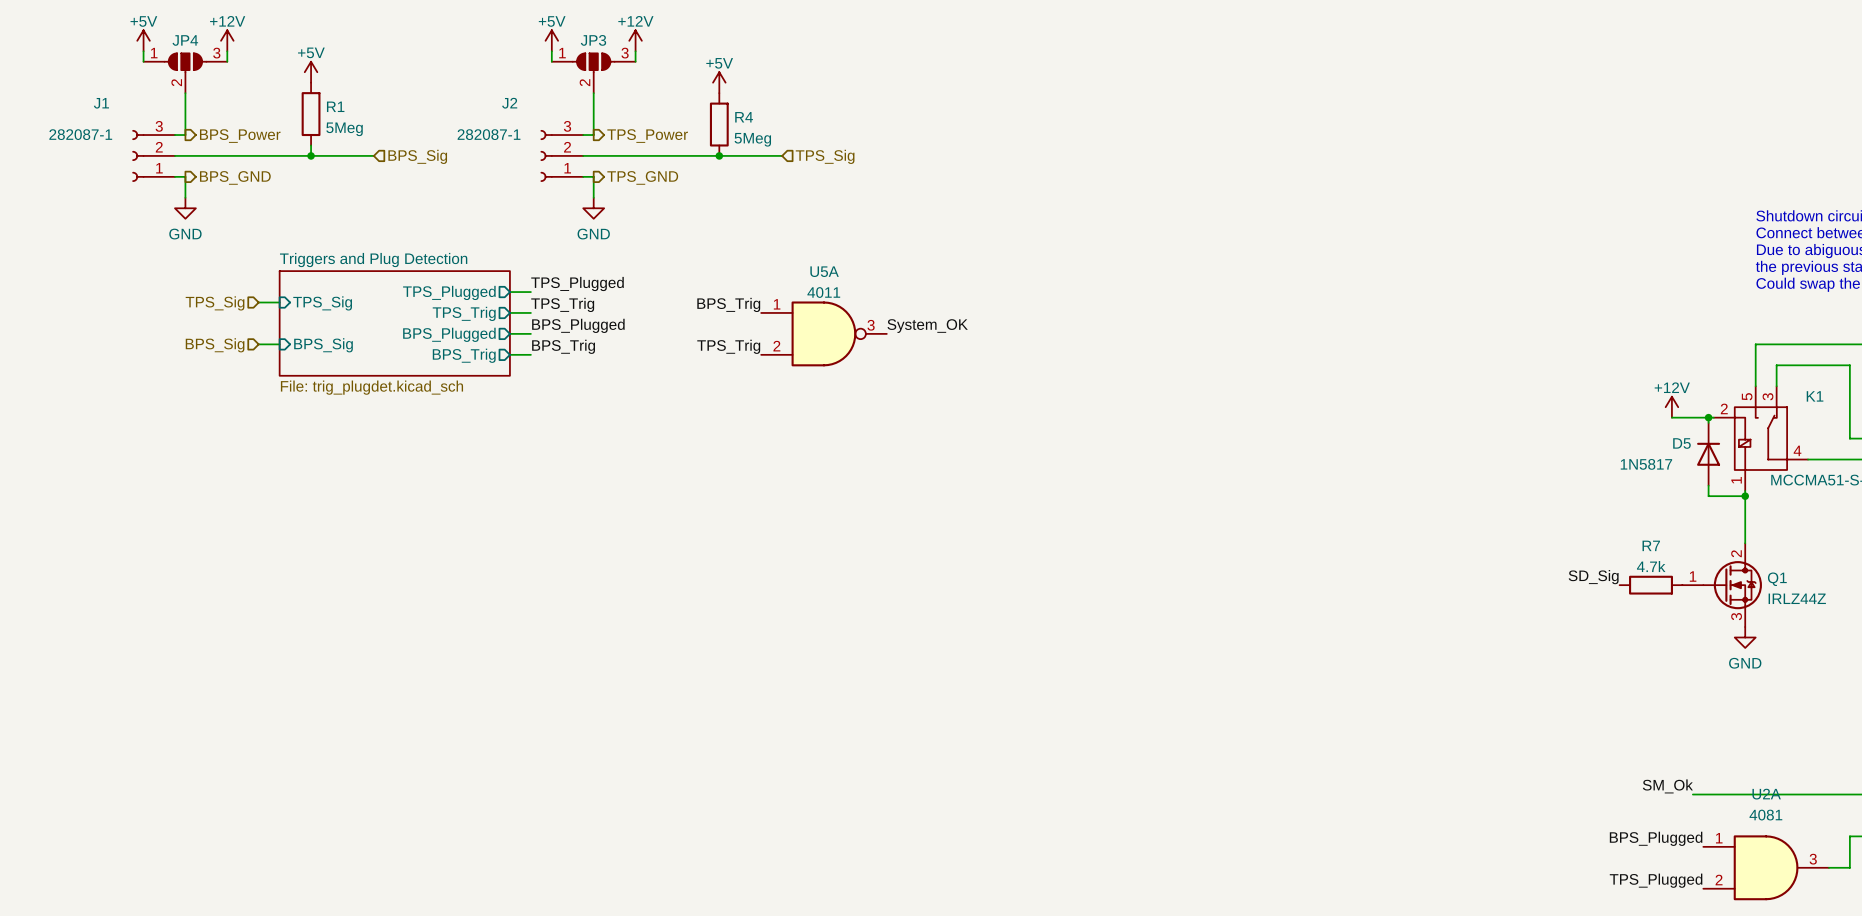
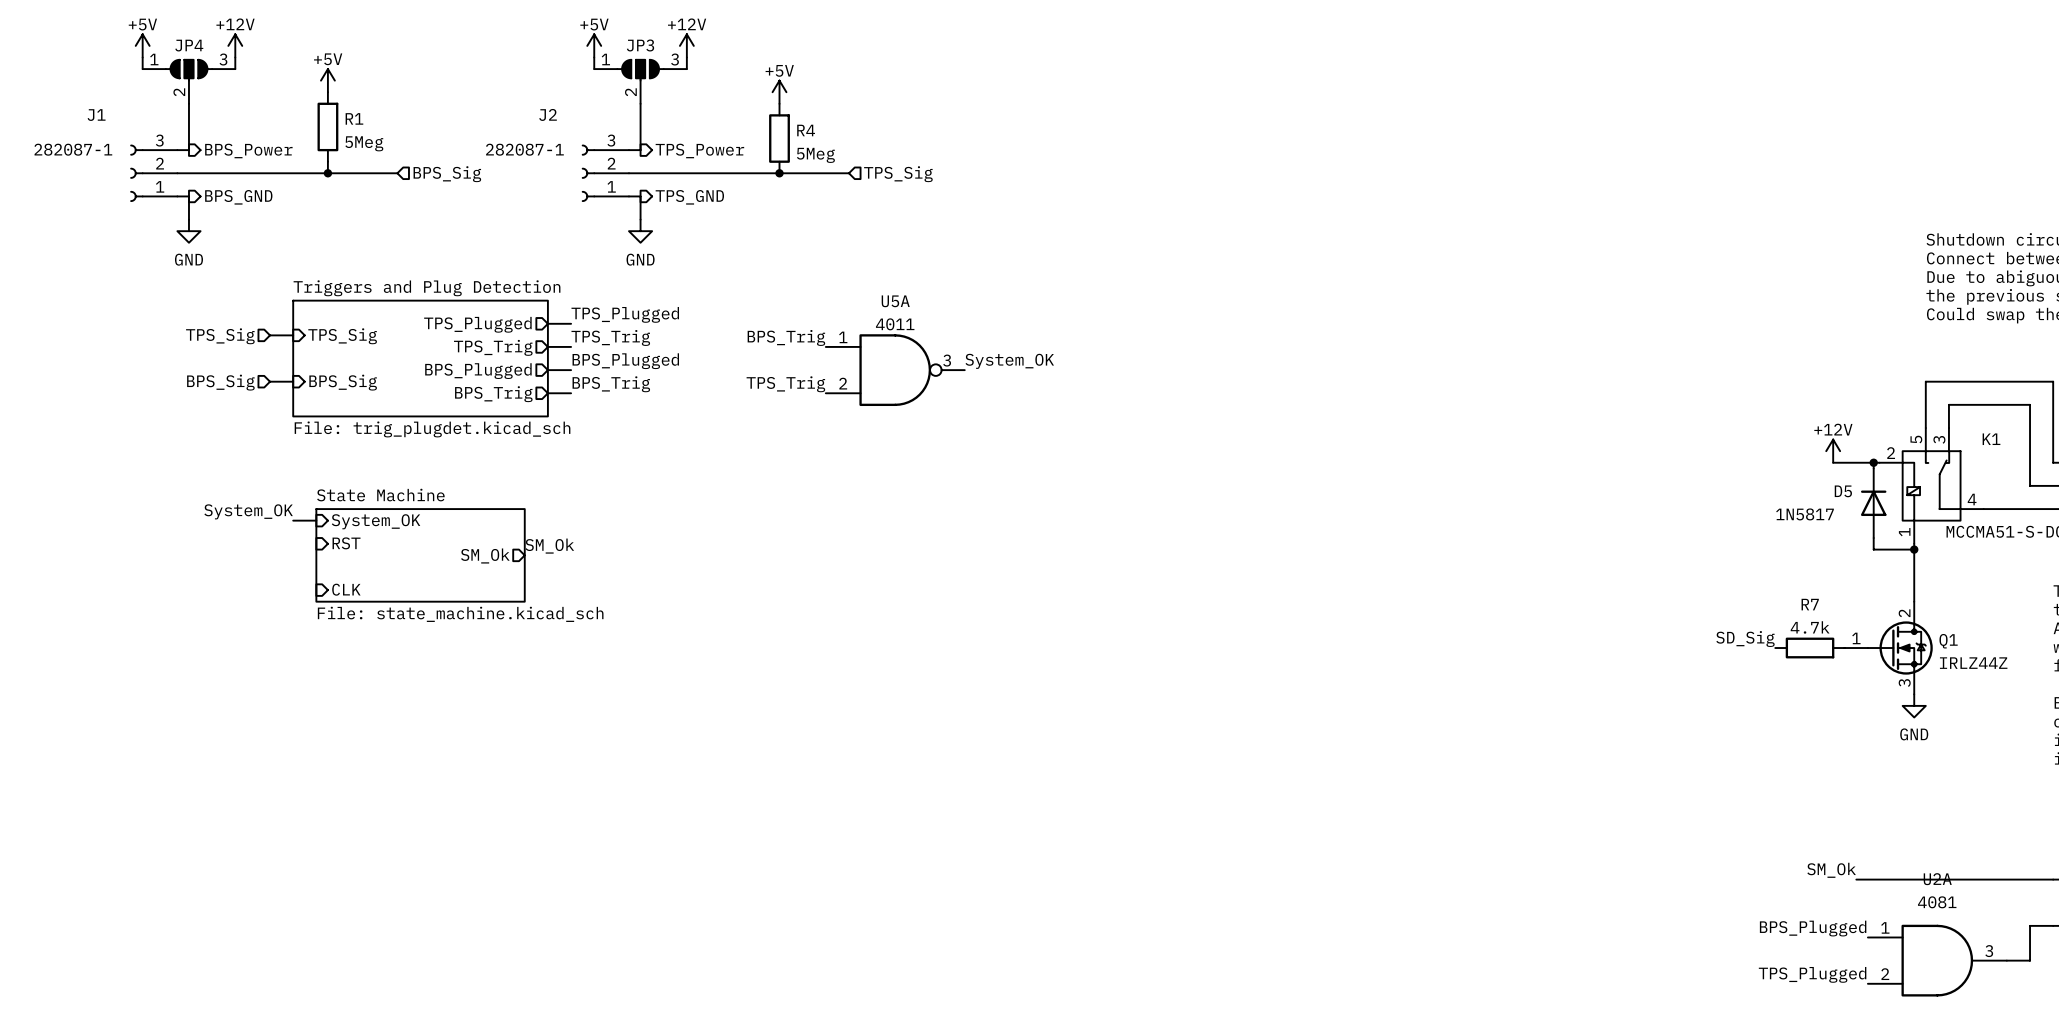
label: none -> System_OK (248, 511)
wire: none -> (293, 520) (316, 520)
sheet pin: none -> System_OK (376, 521)
sheet pin: none -> RST (346, 543)
label: none -> SM_Ok (549, 546)
sheet State Machine: none -> File: state_machine.kicad_sch (420, 555)
sheet pin: none -> SM_Ok (485, 556)
sheet pin: none -> CLK (346, 589)

